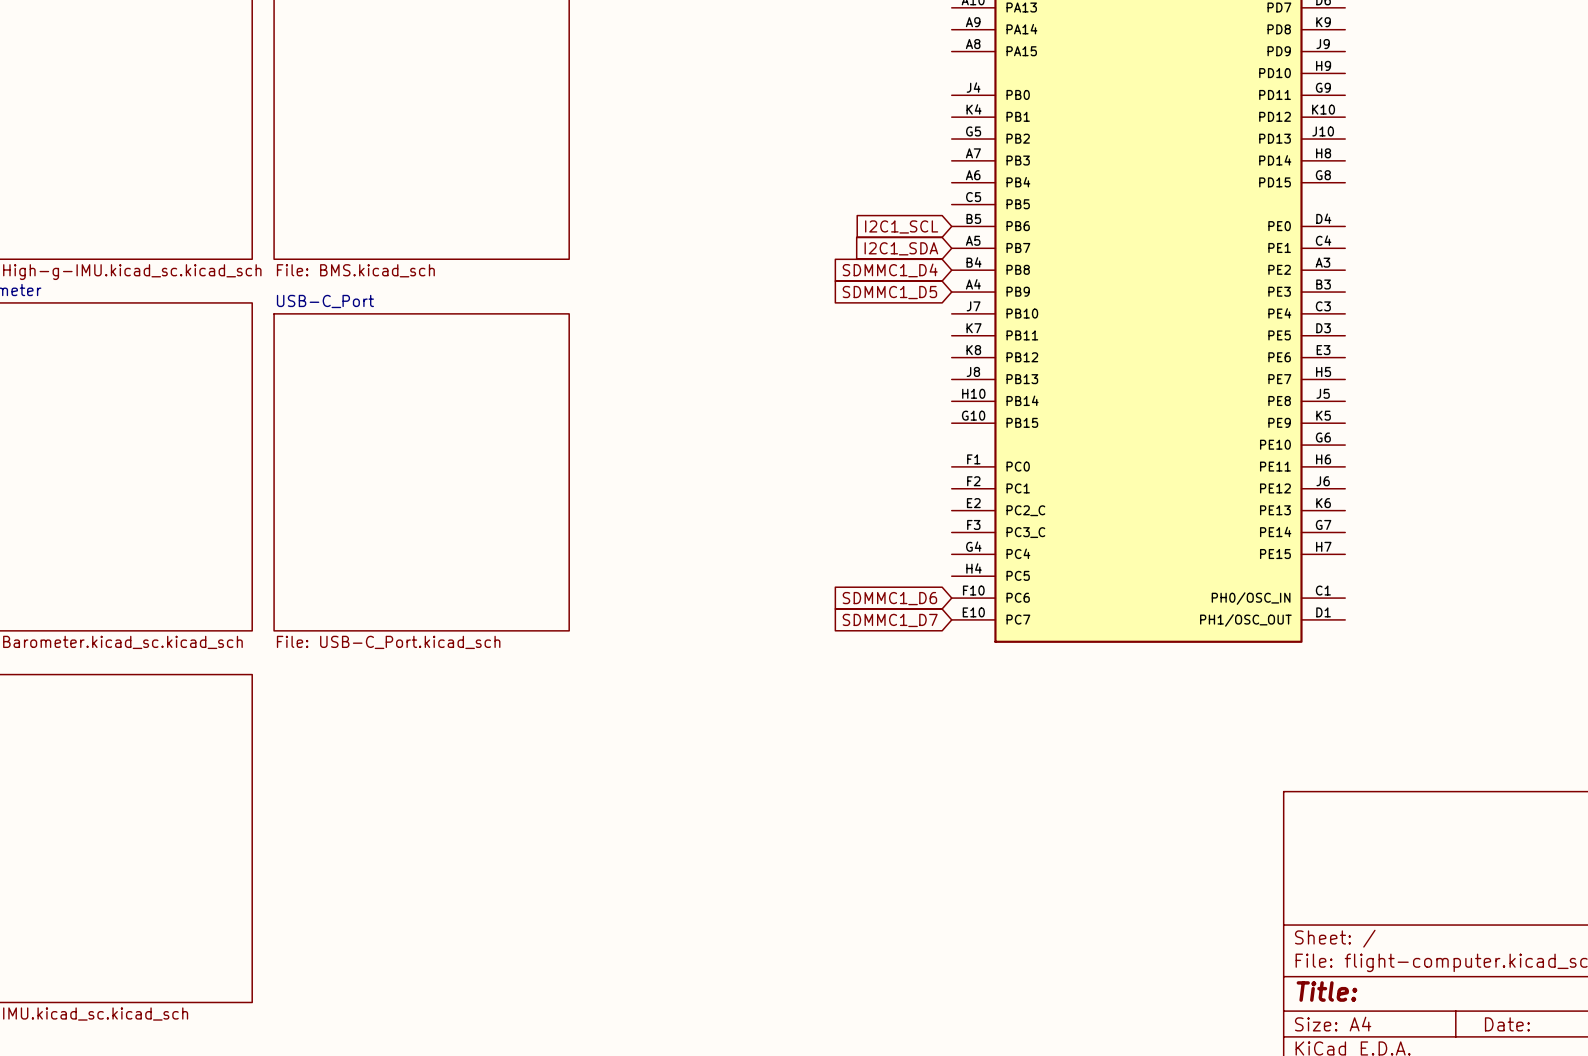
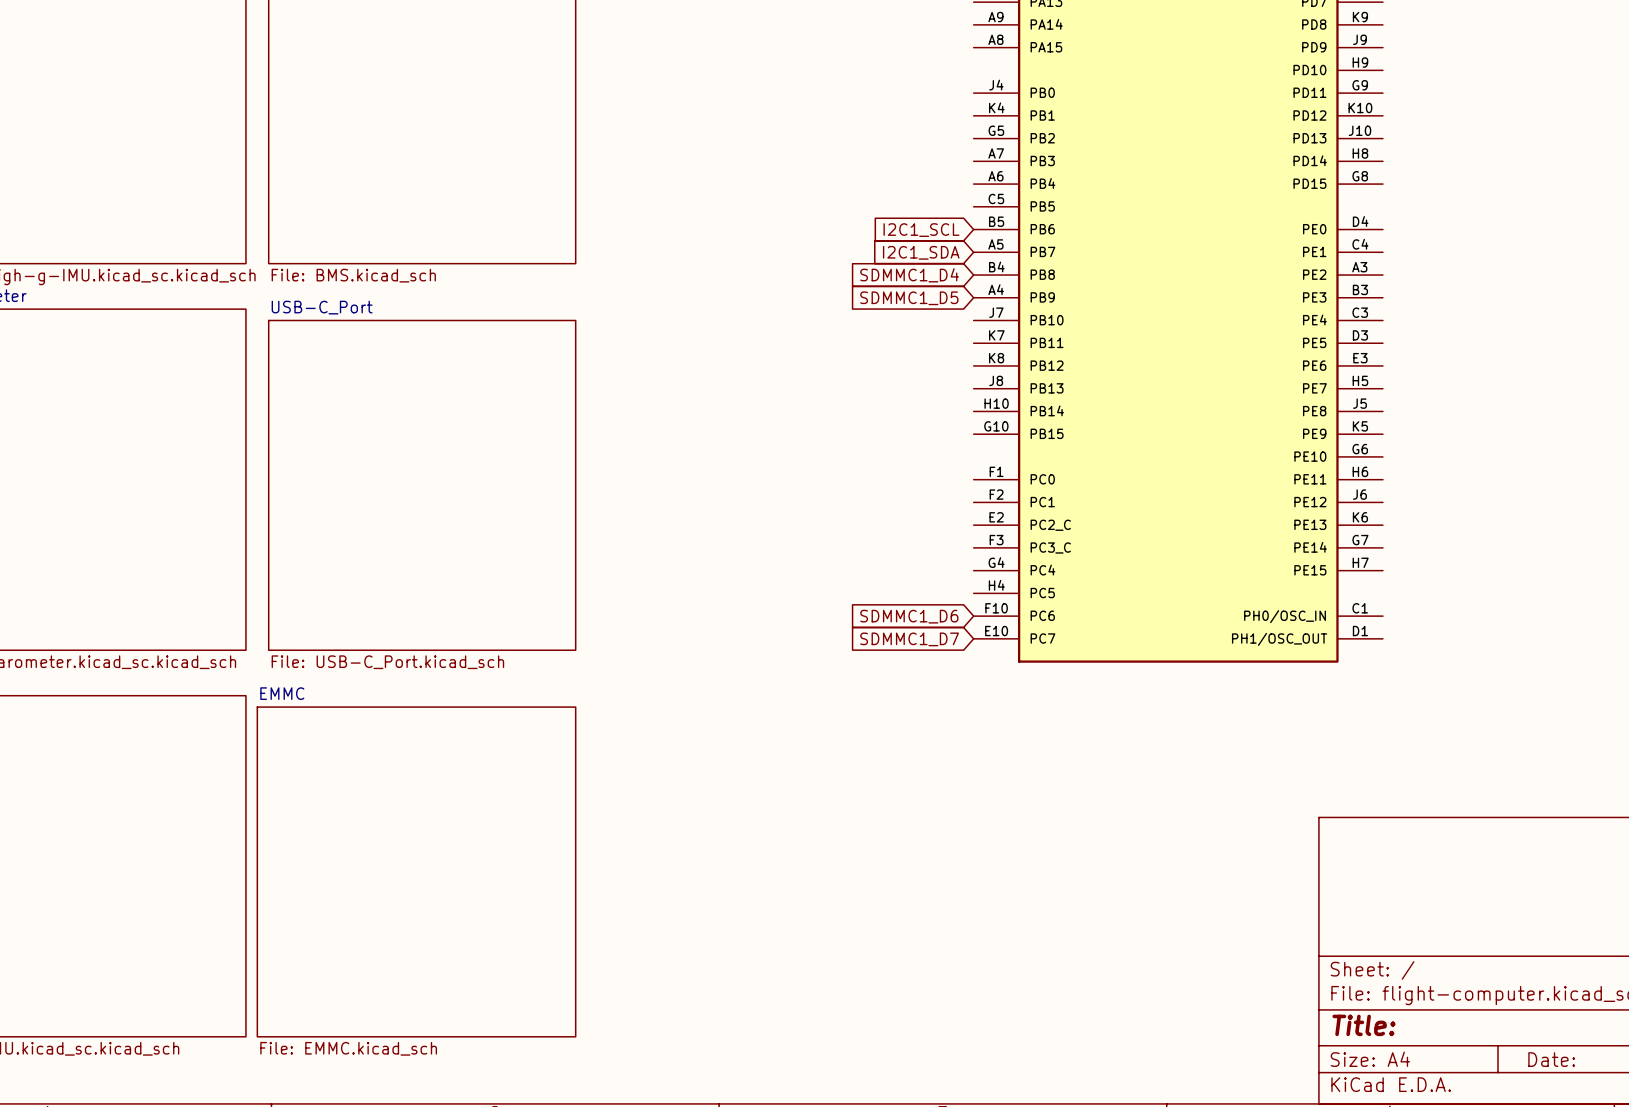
sheet EMMC: none -> File: EMMC.kicad_sch (416, 871)

